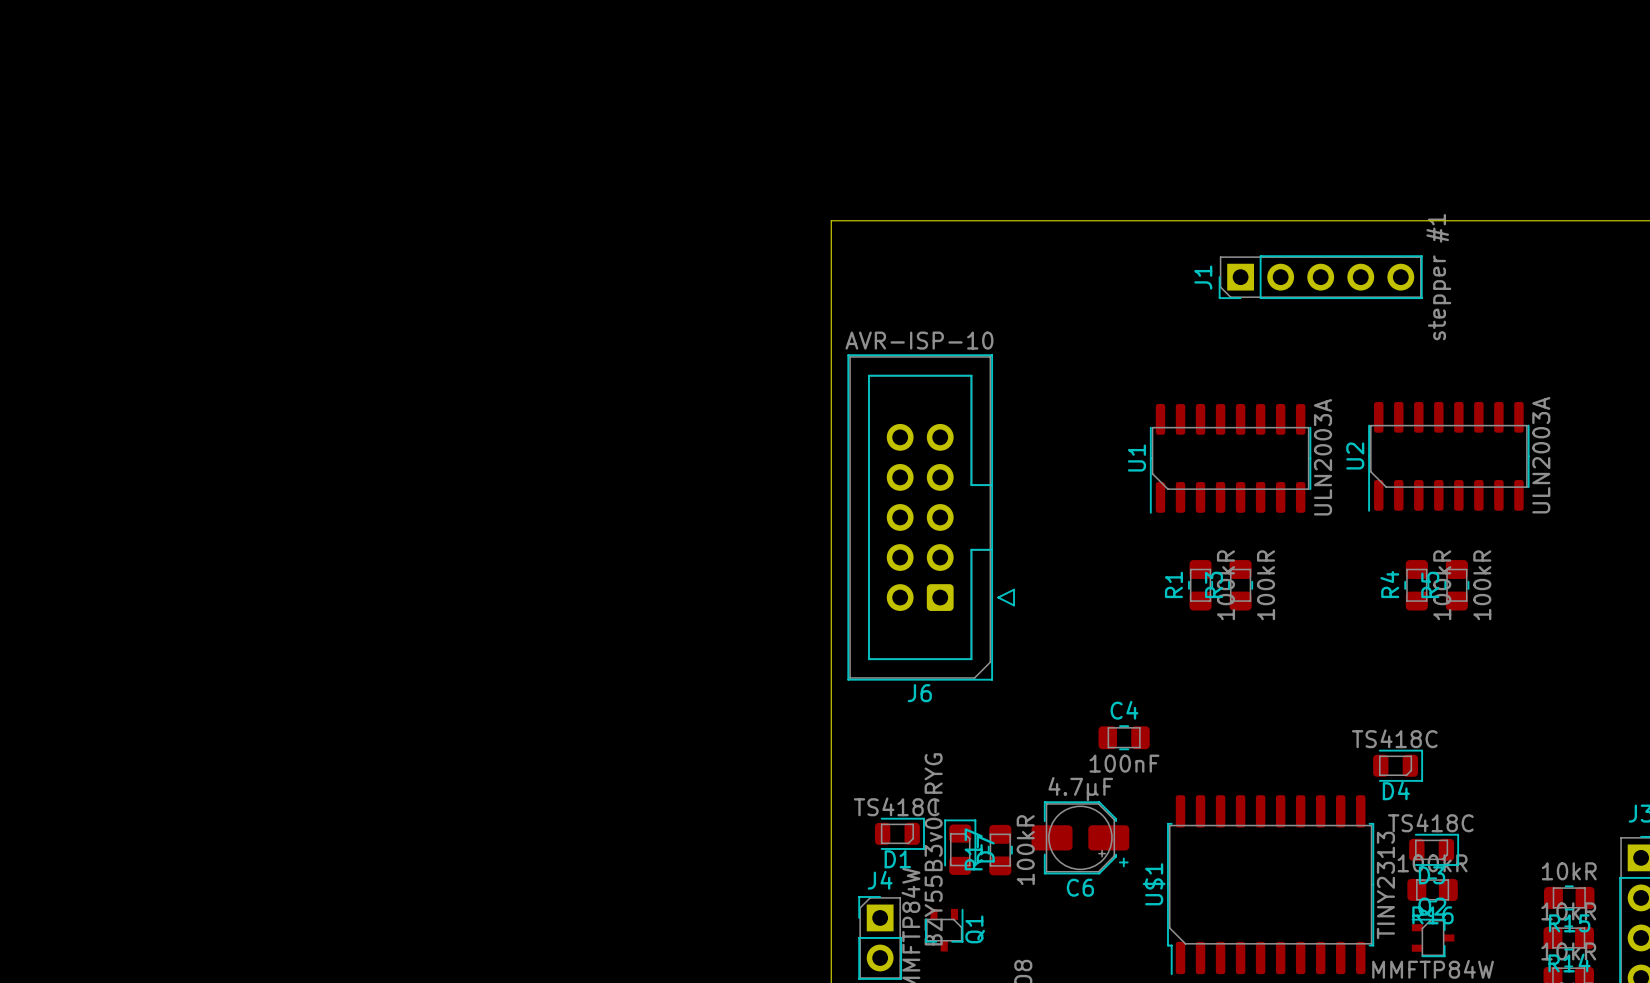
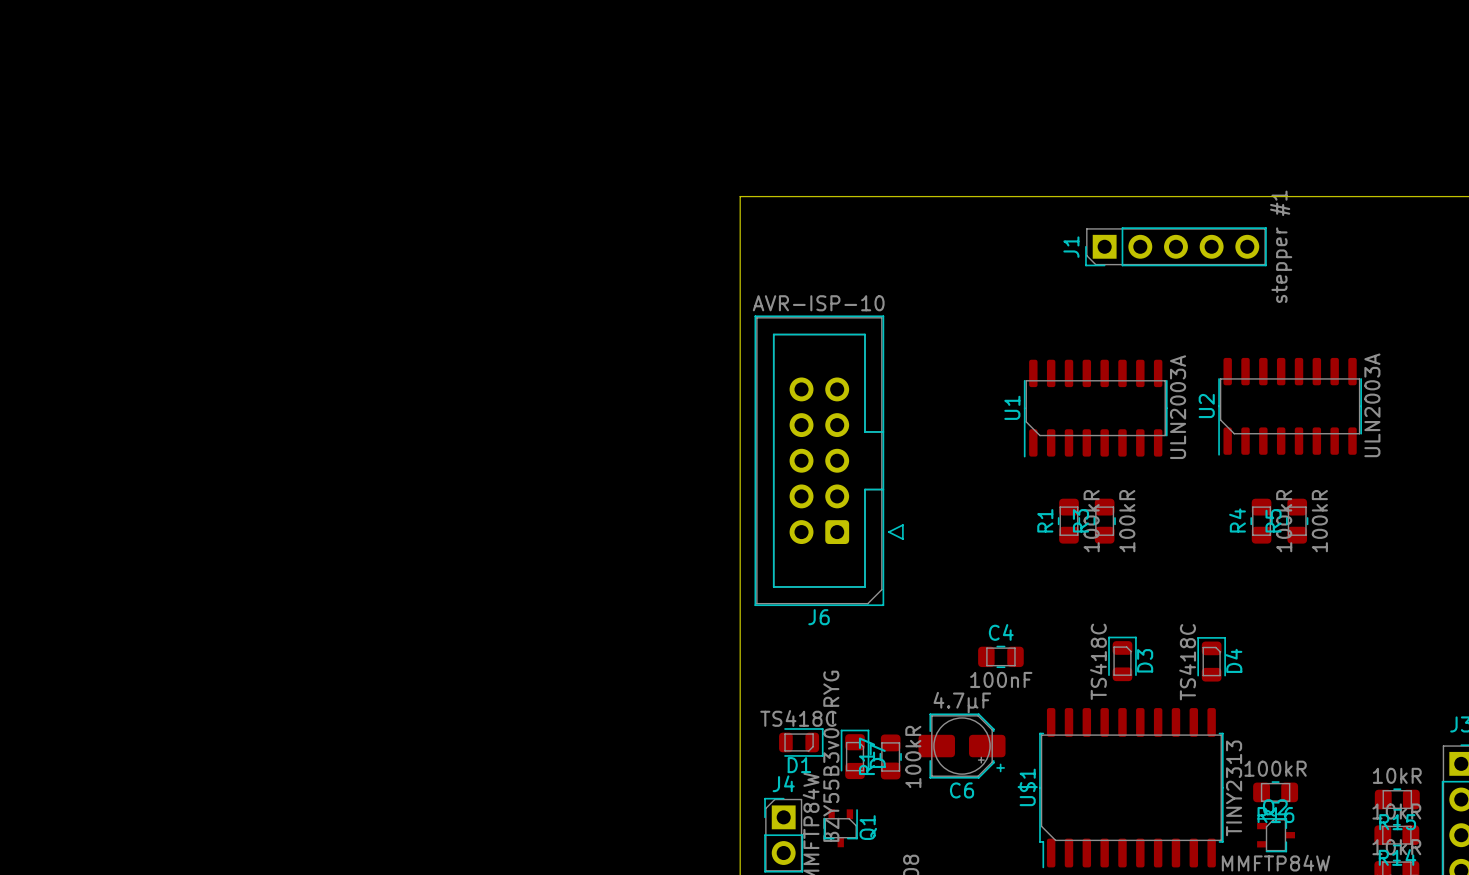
D4 rotation: 0° (1398, 765) -> 90° counterclockwise (1211, 659)
D4 position: (1398, 765) -> (1211, 659)
D3 rotation: 0° (1434, 849) -> 90° counterclockwise (1122, 658)
D3 position: (1434, 849) -> (1122, 658)

